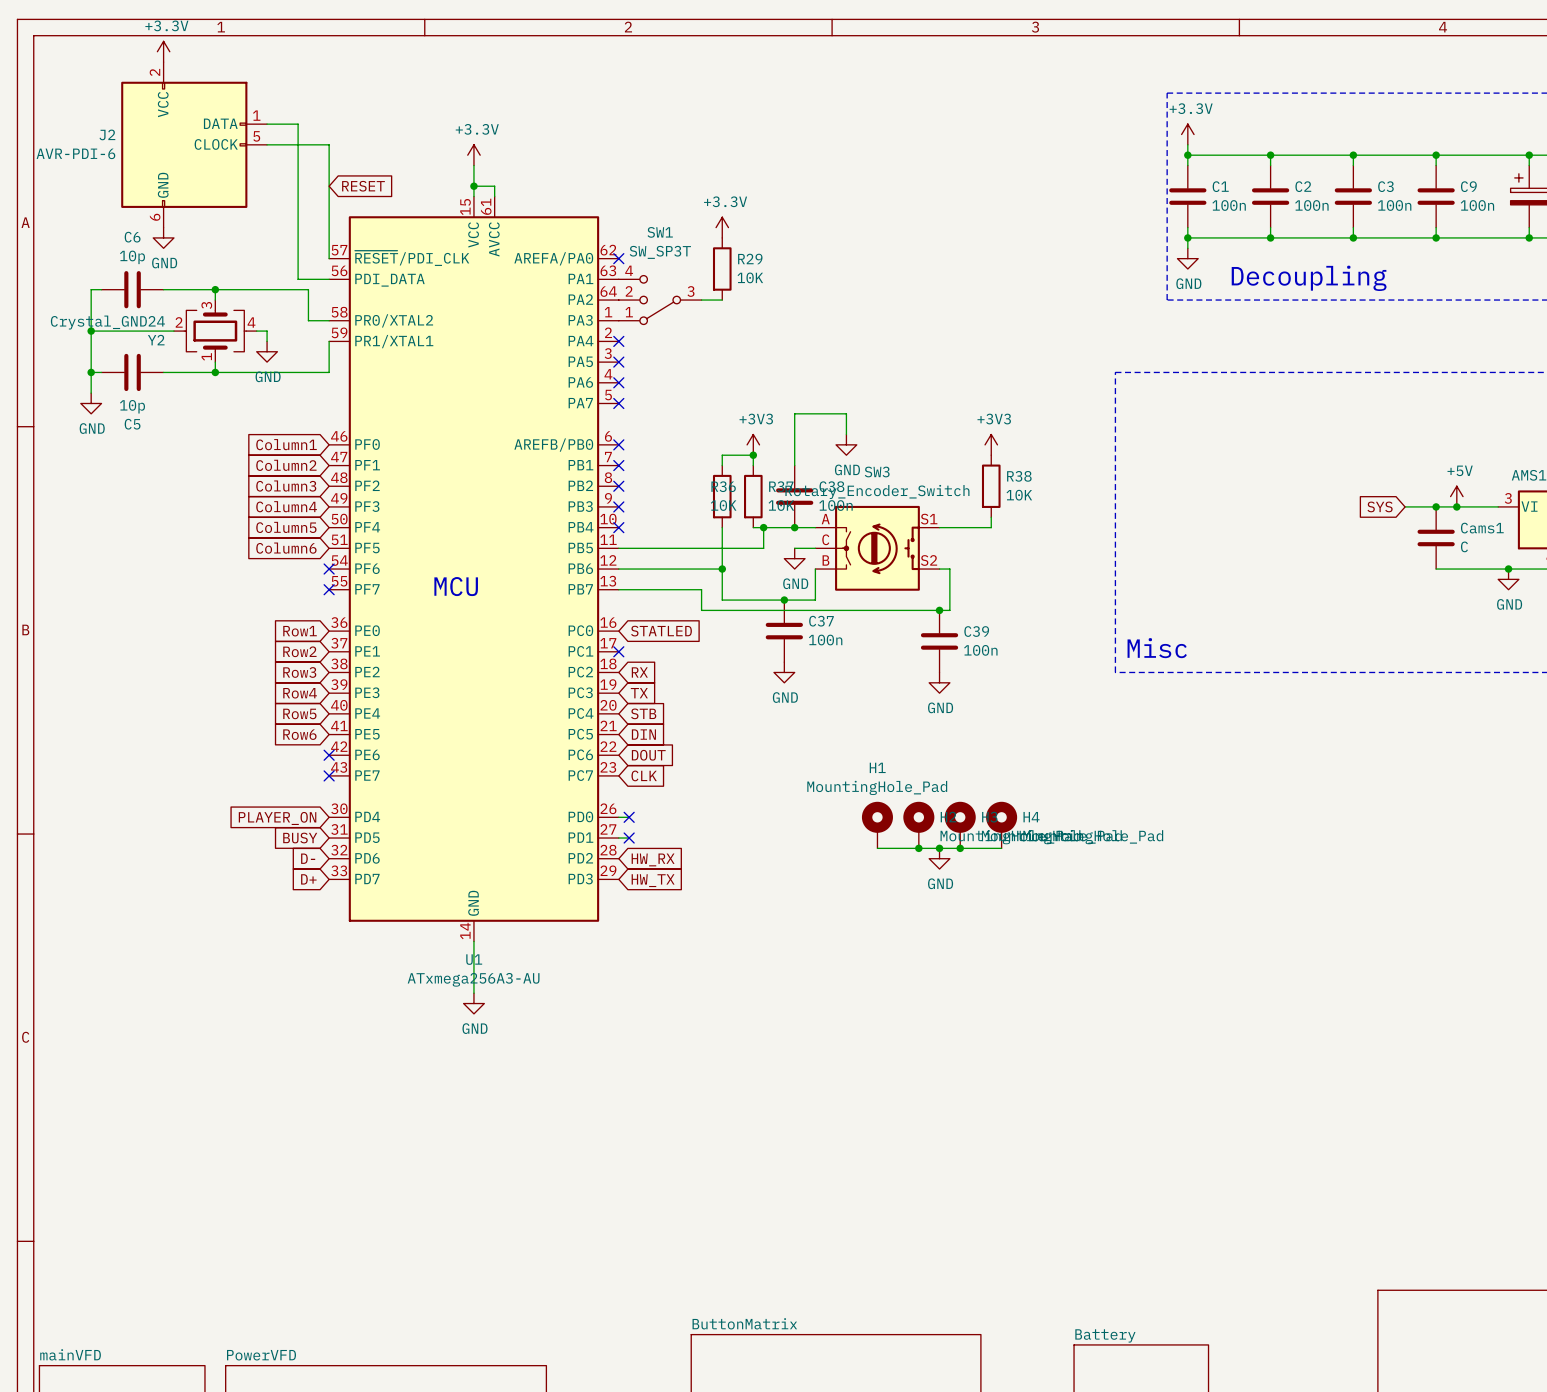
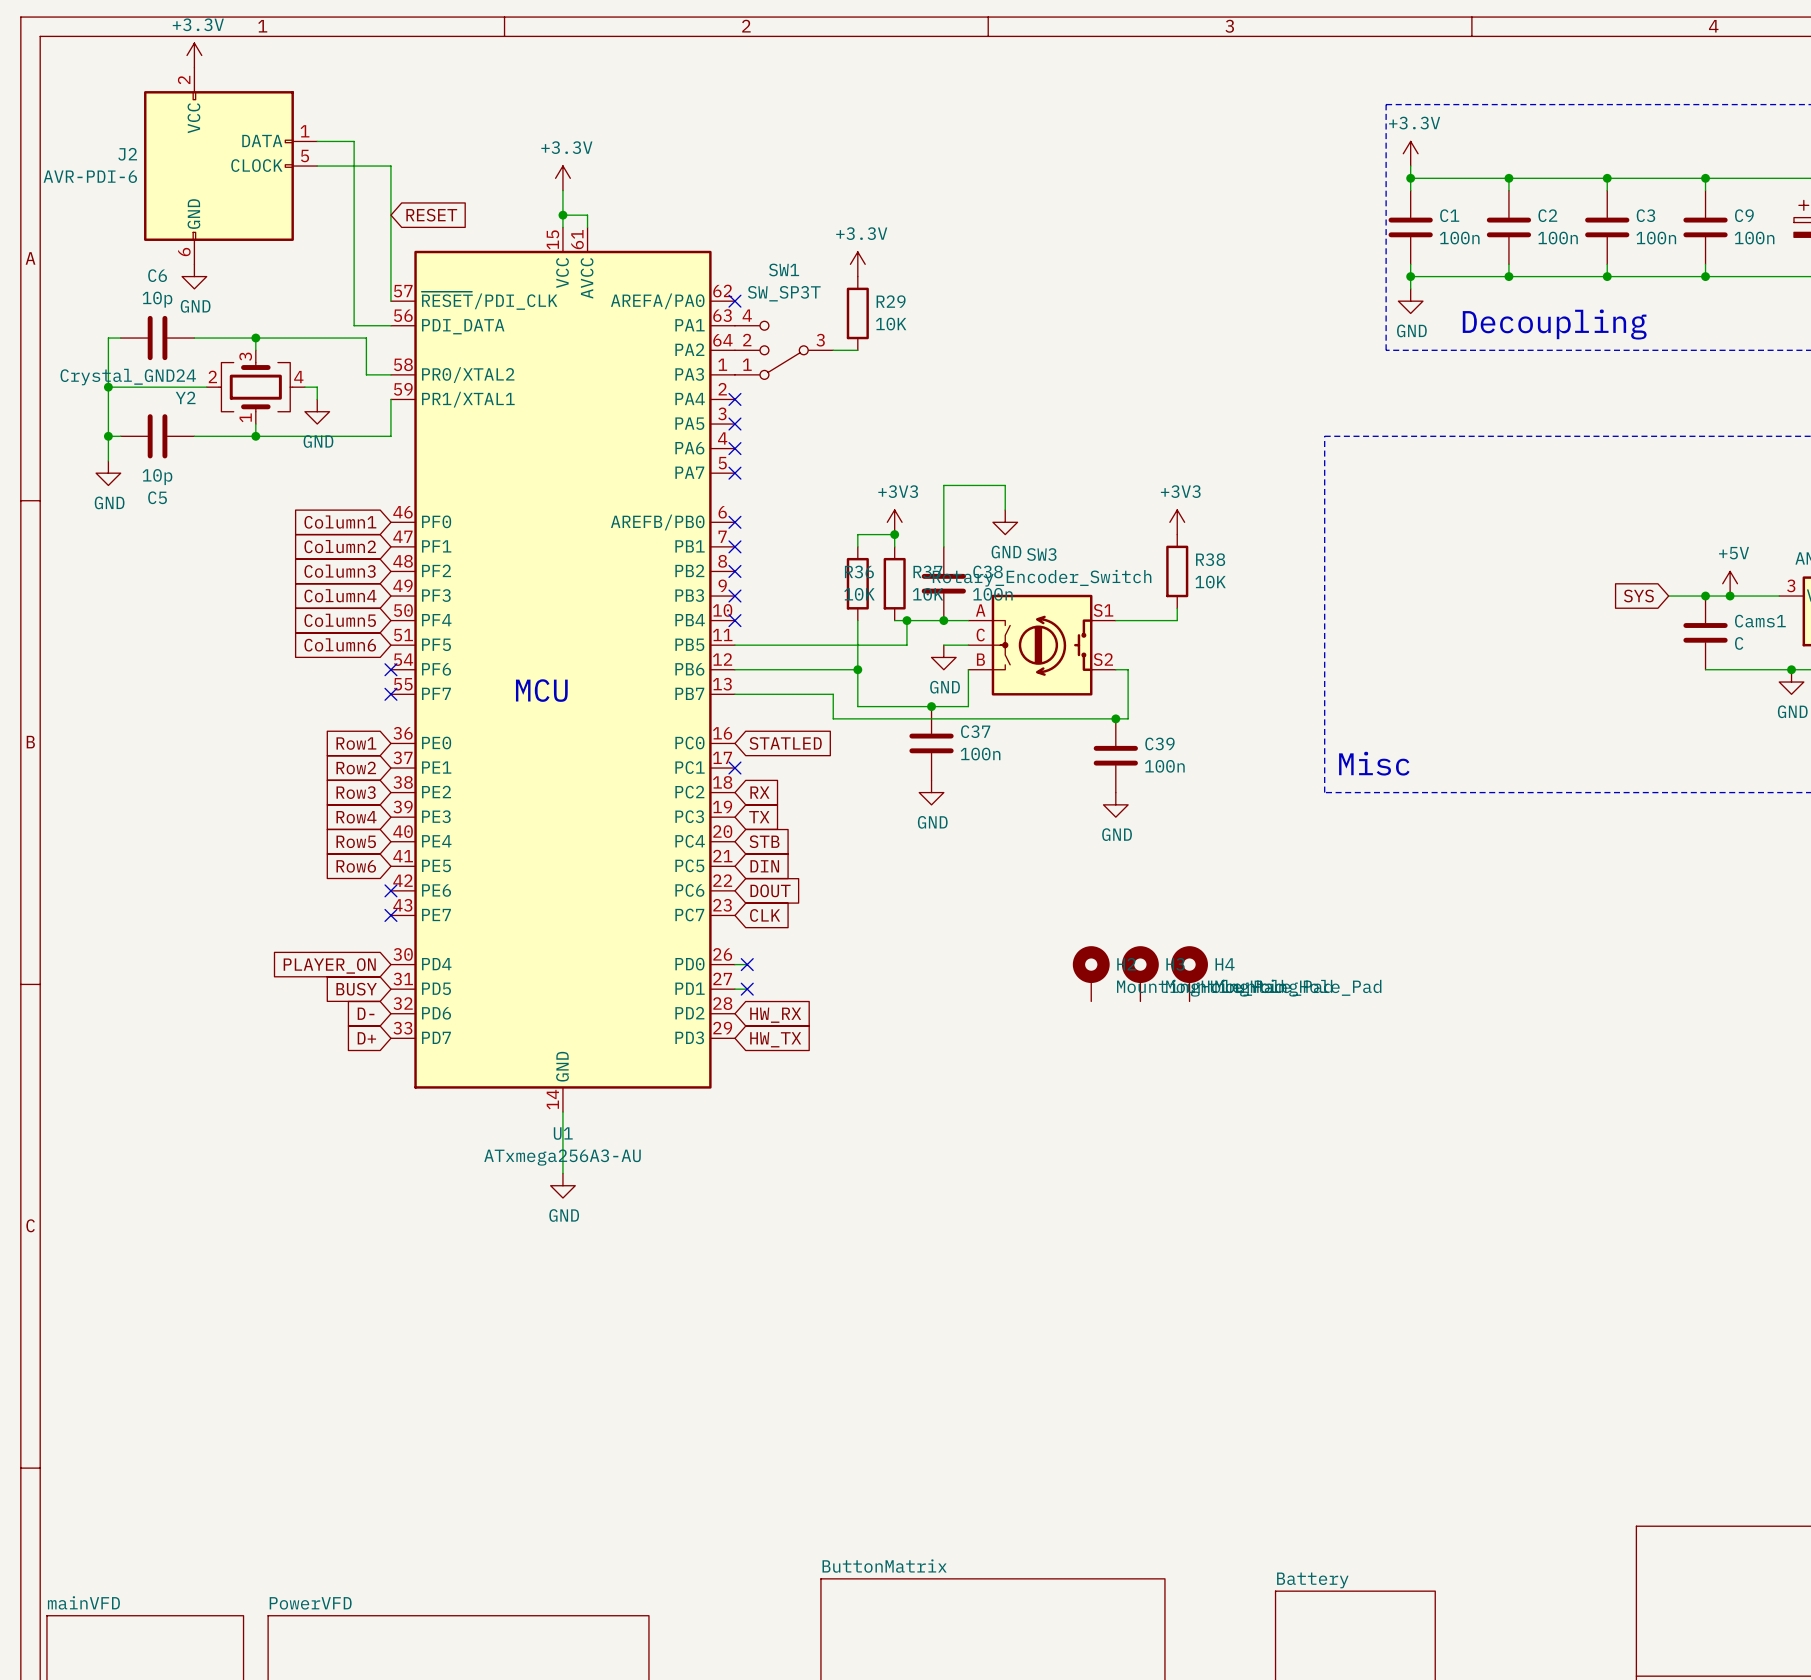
H1: MountingHole_Pad (877, 825) -> none
wire: (877, 848) (1001, 848) -> none
junction: (918, 848) -> none
junction: (939, 848) -> none
junction: (960, 848) -> none
power symbol: GND (939, 858) -> none

